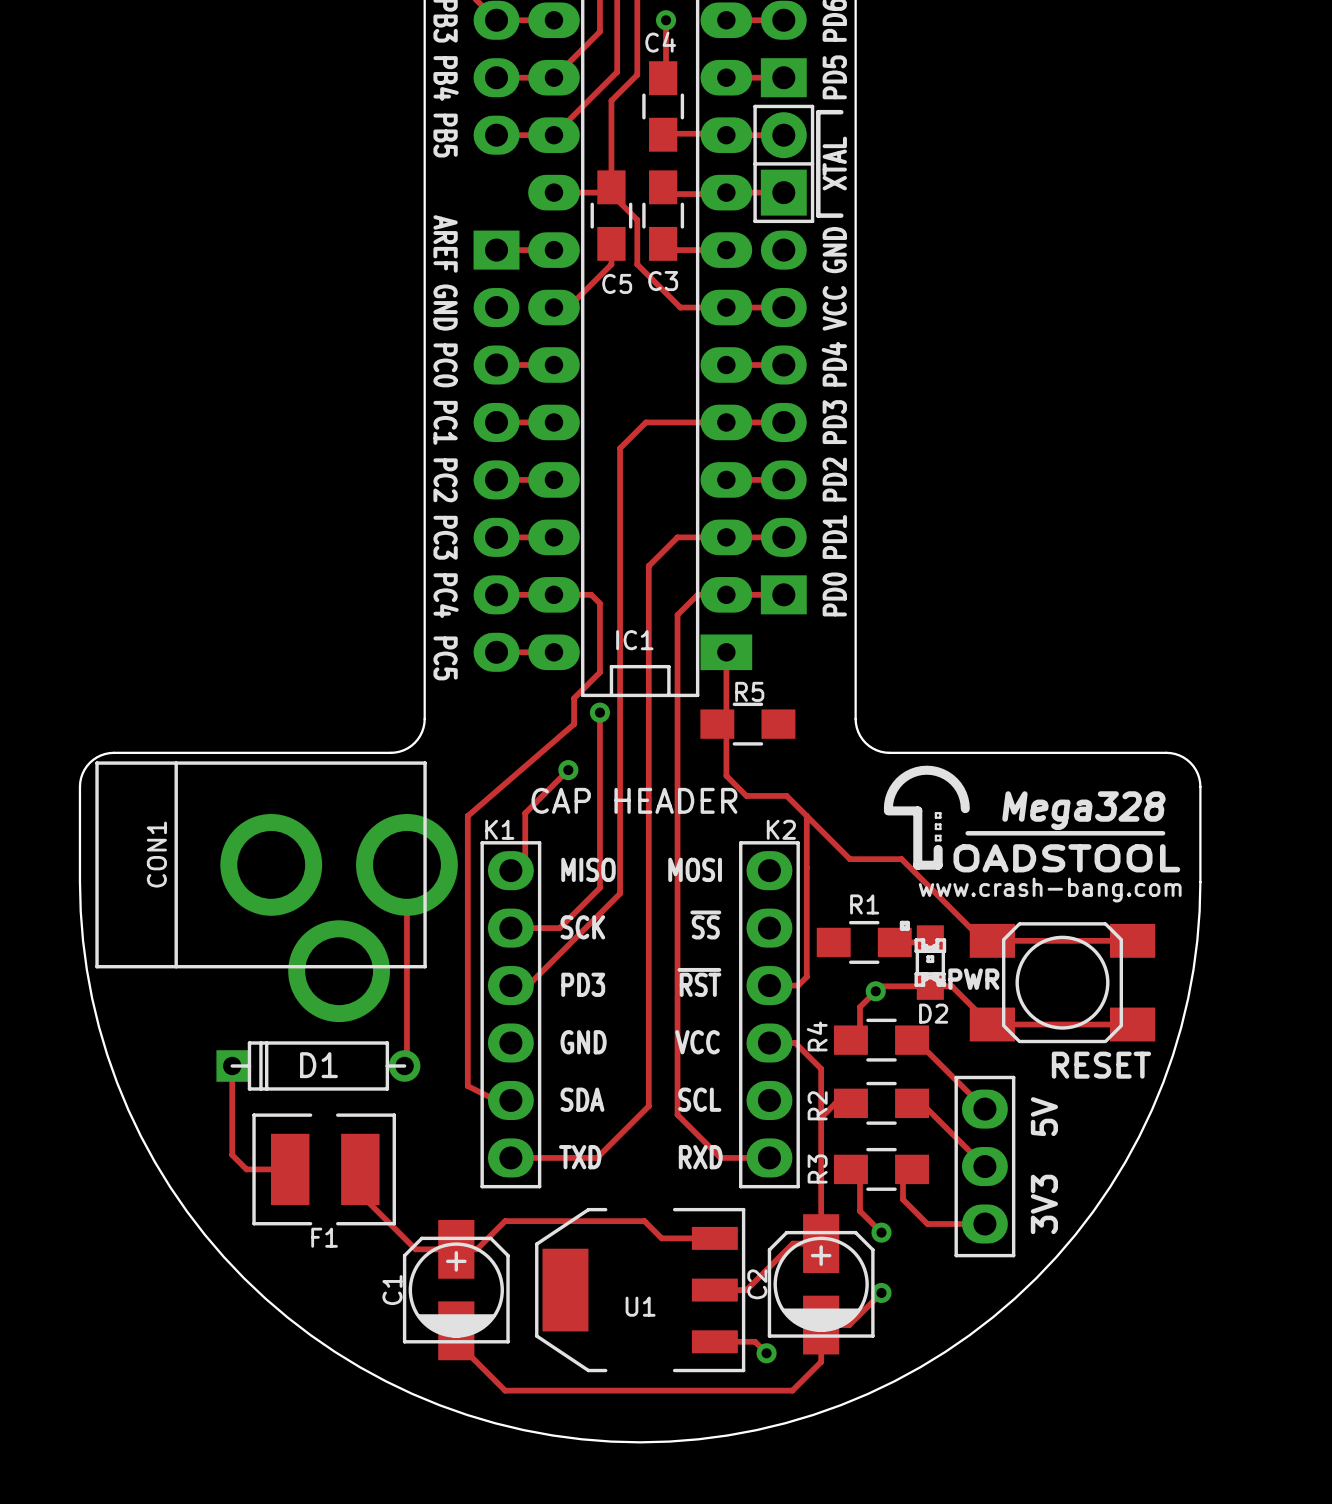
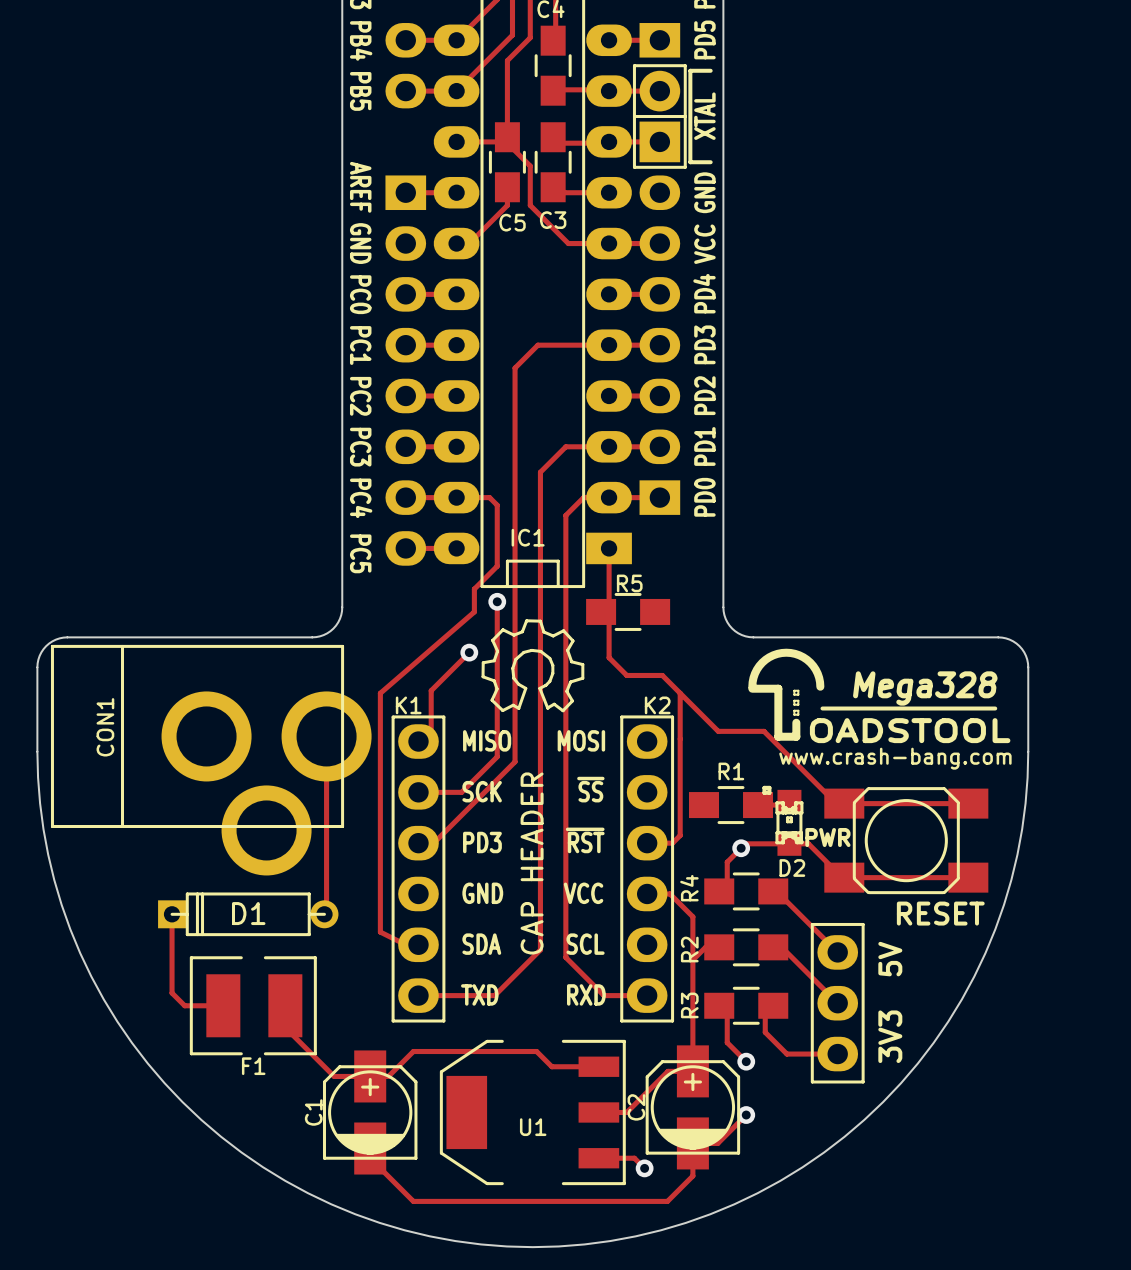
drawing: none -> [481, 619, 585, 713]
text rotation: 0° (634, 800) -> 90° counterclockwise (532, 863)

